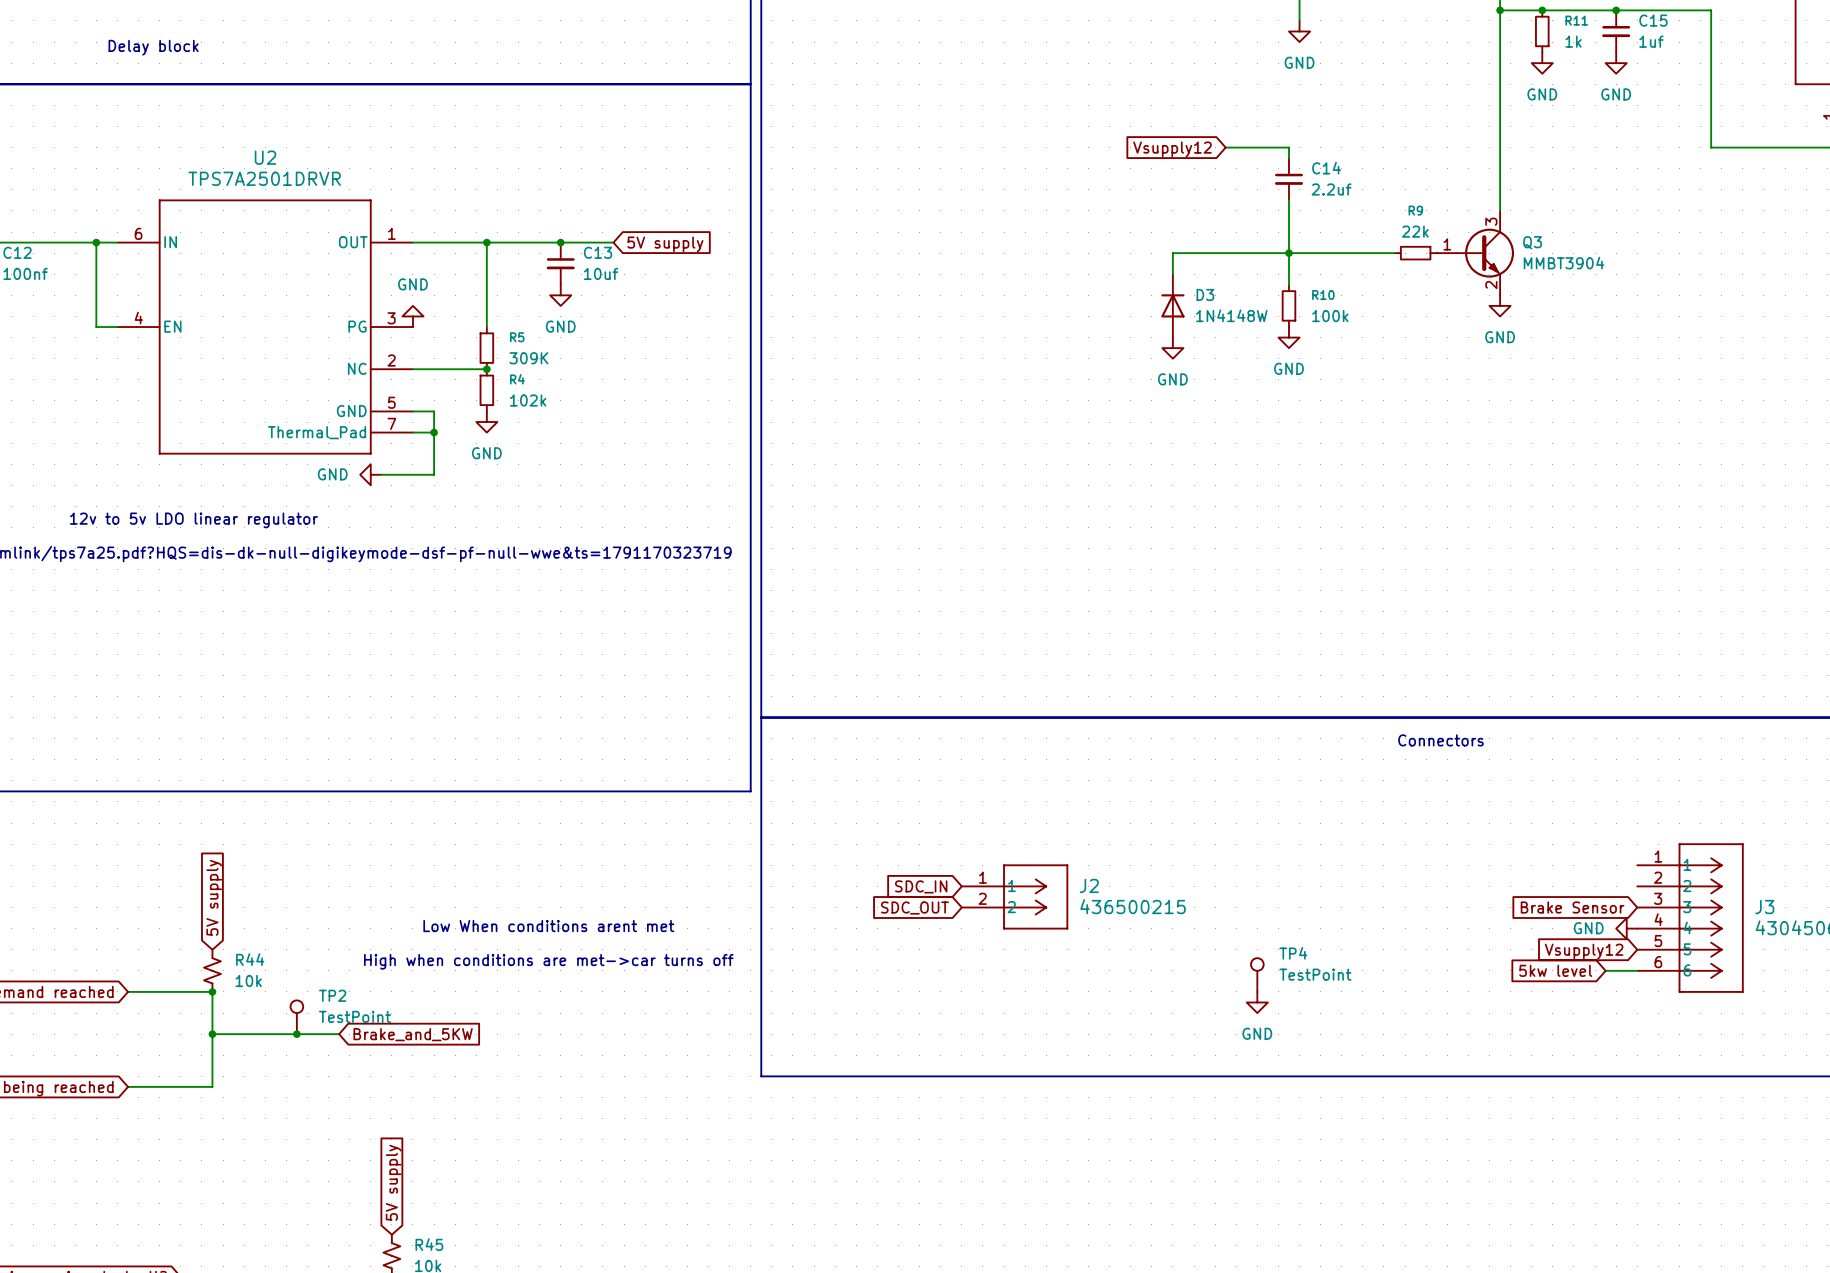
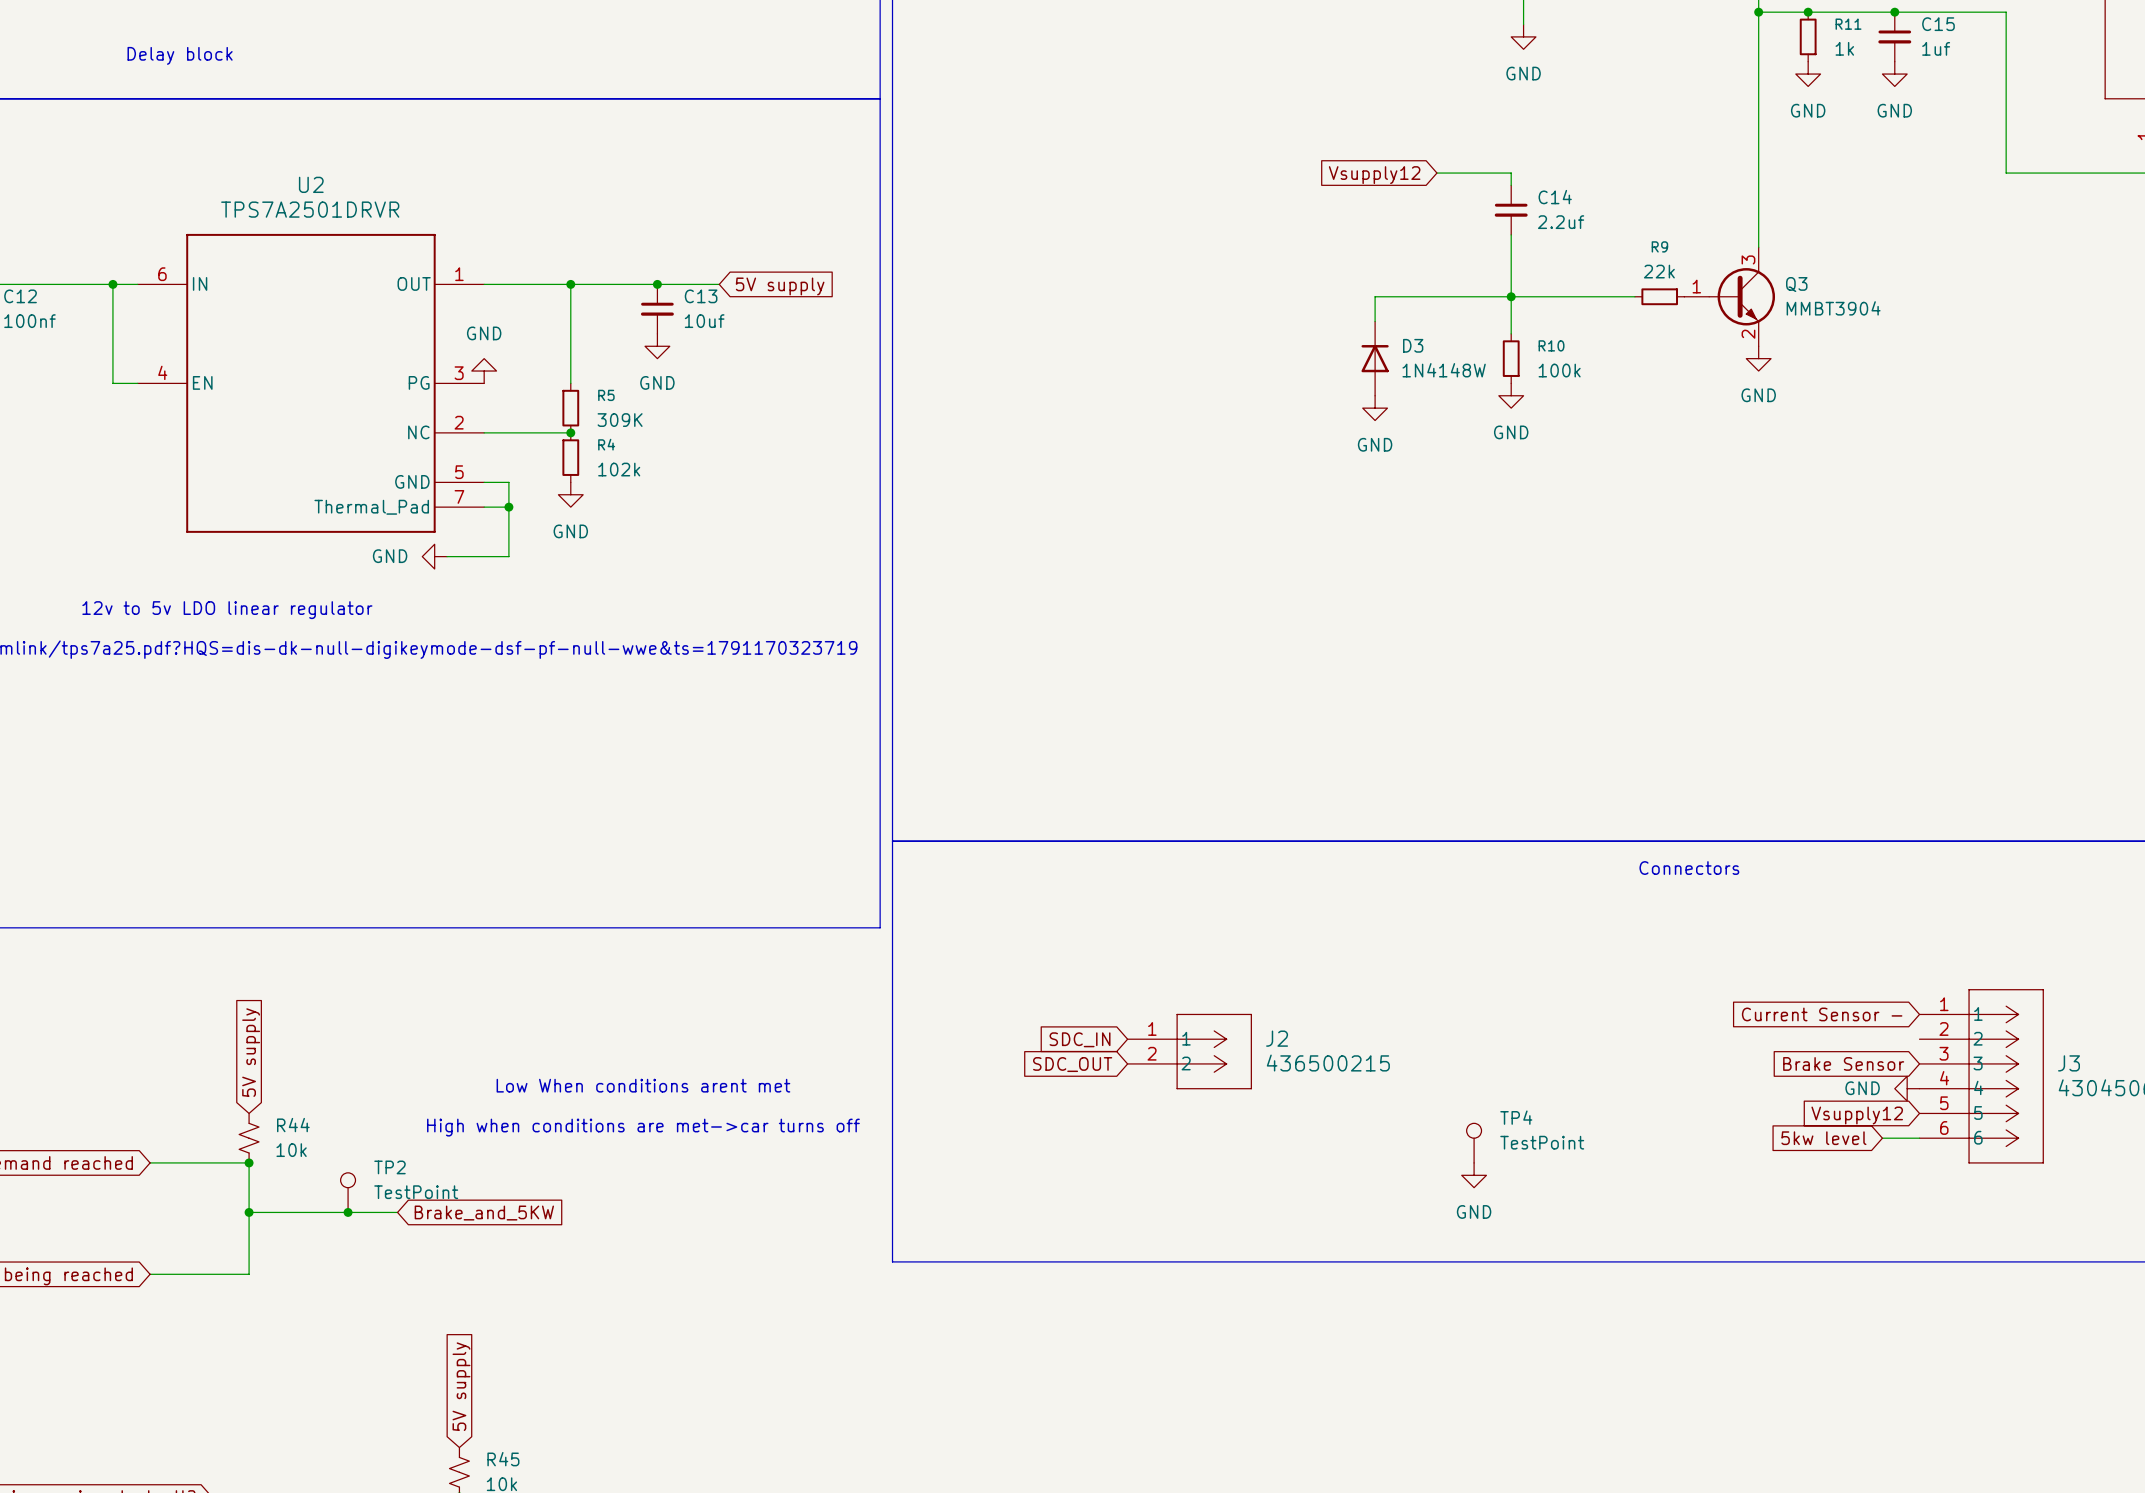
global label: none -> Current Sensor - (1822, 1014)

